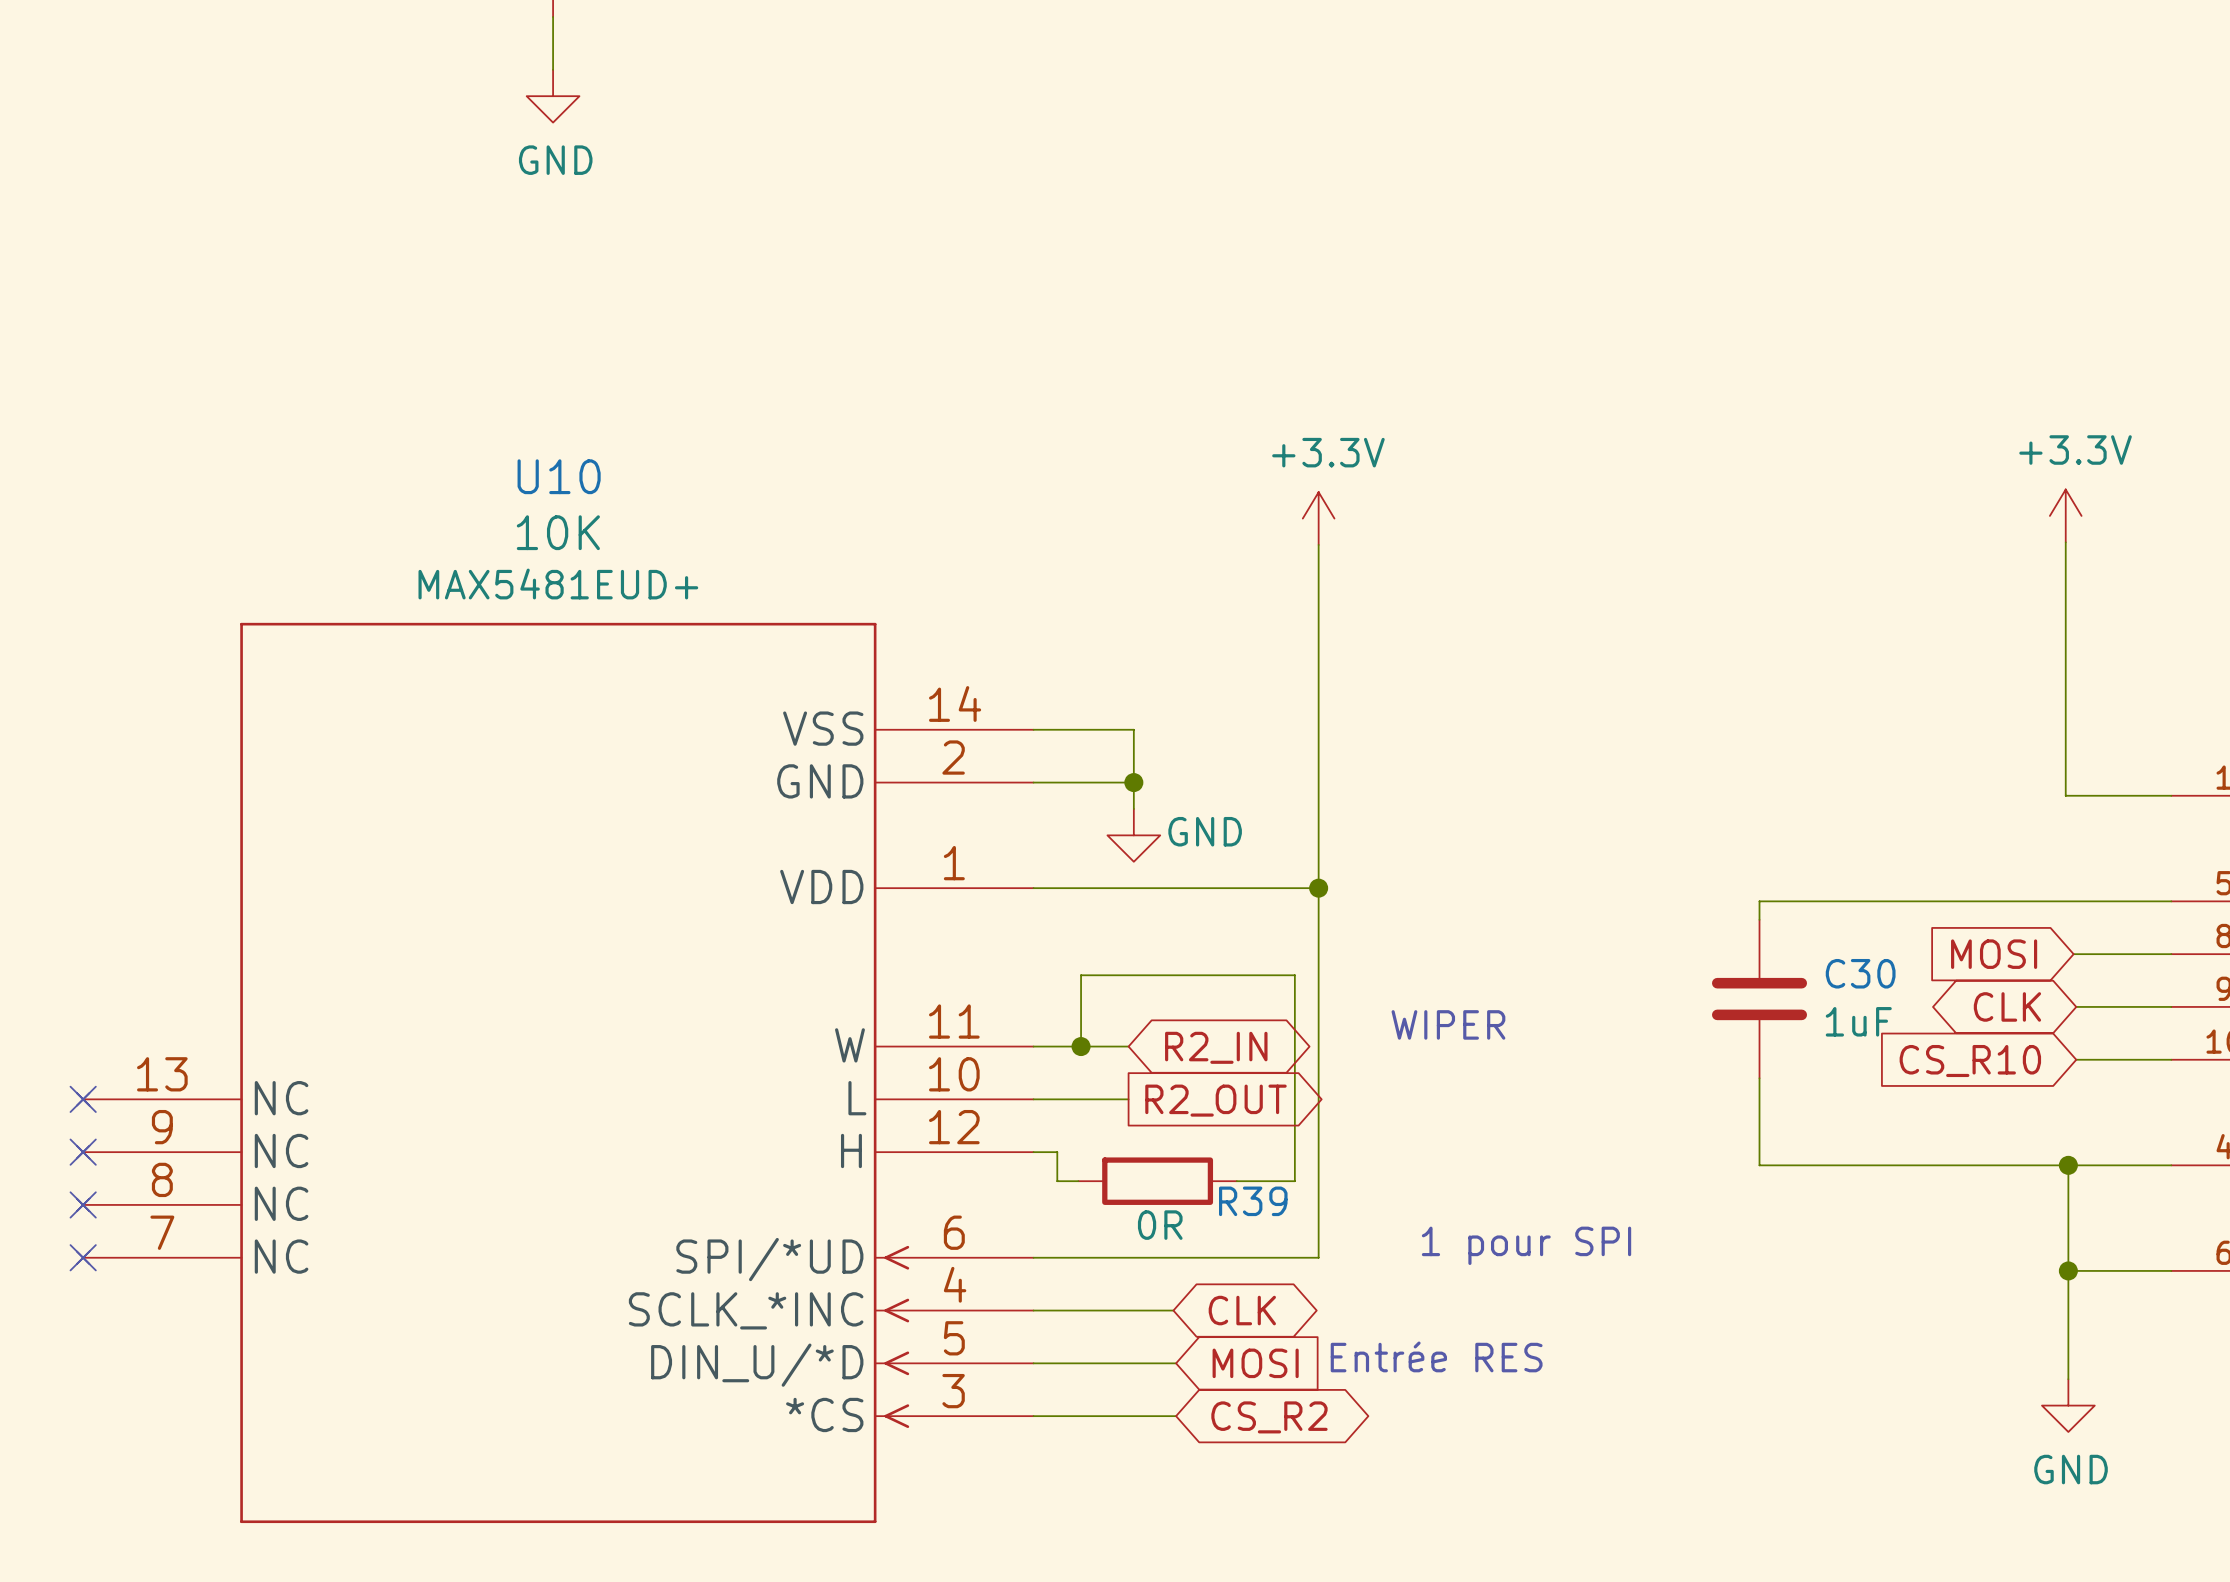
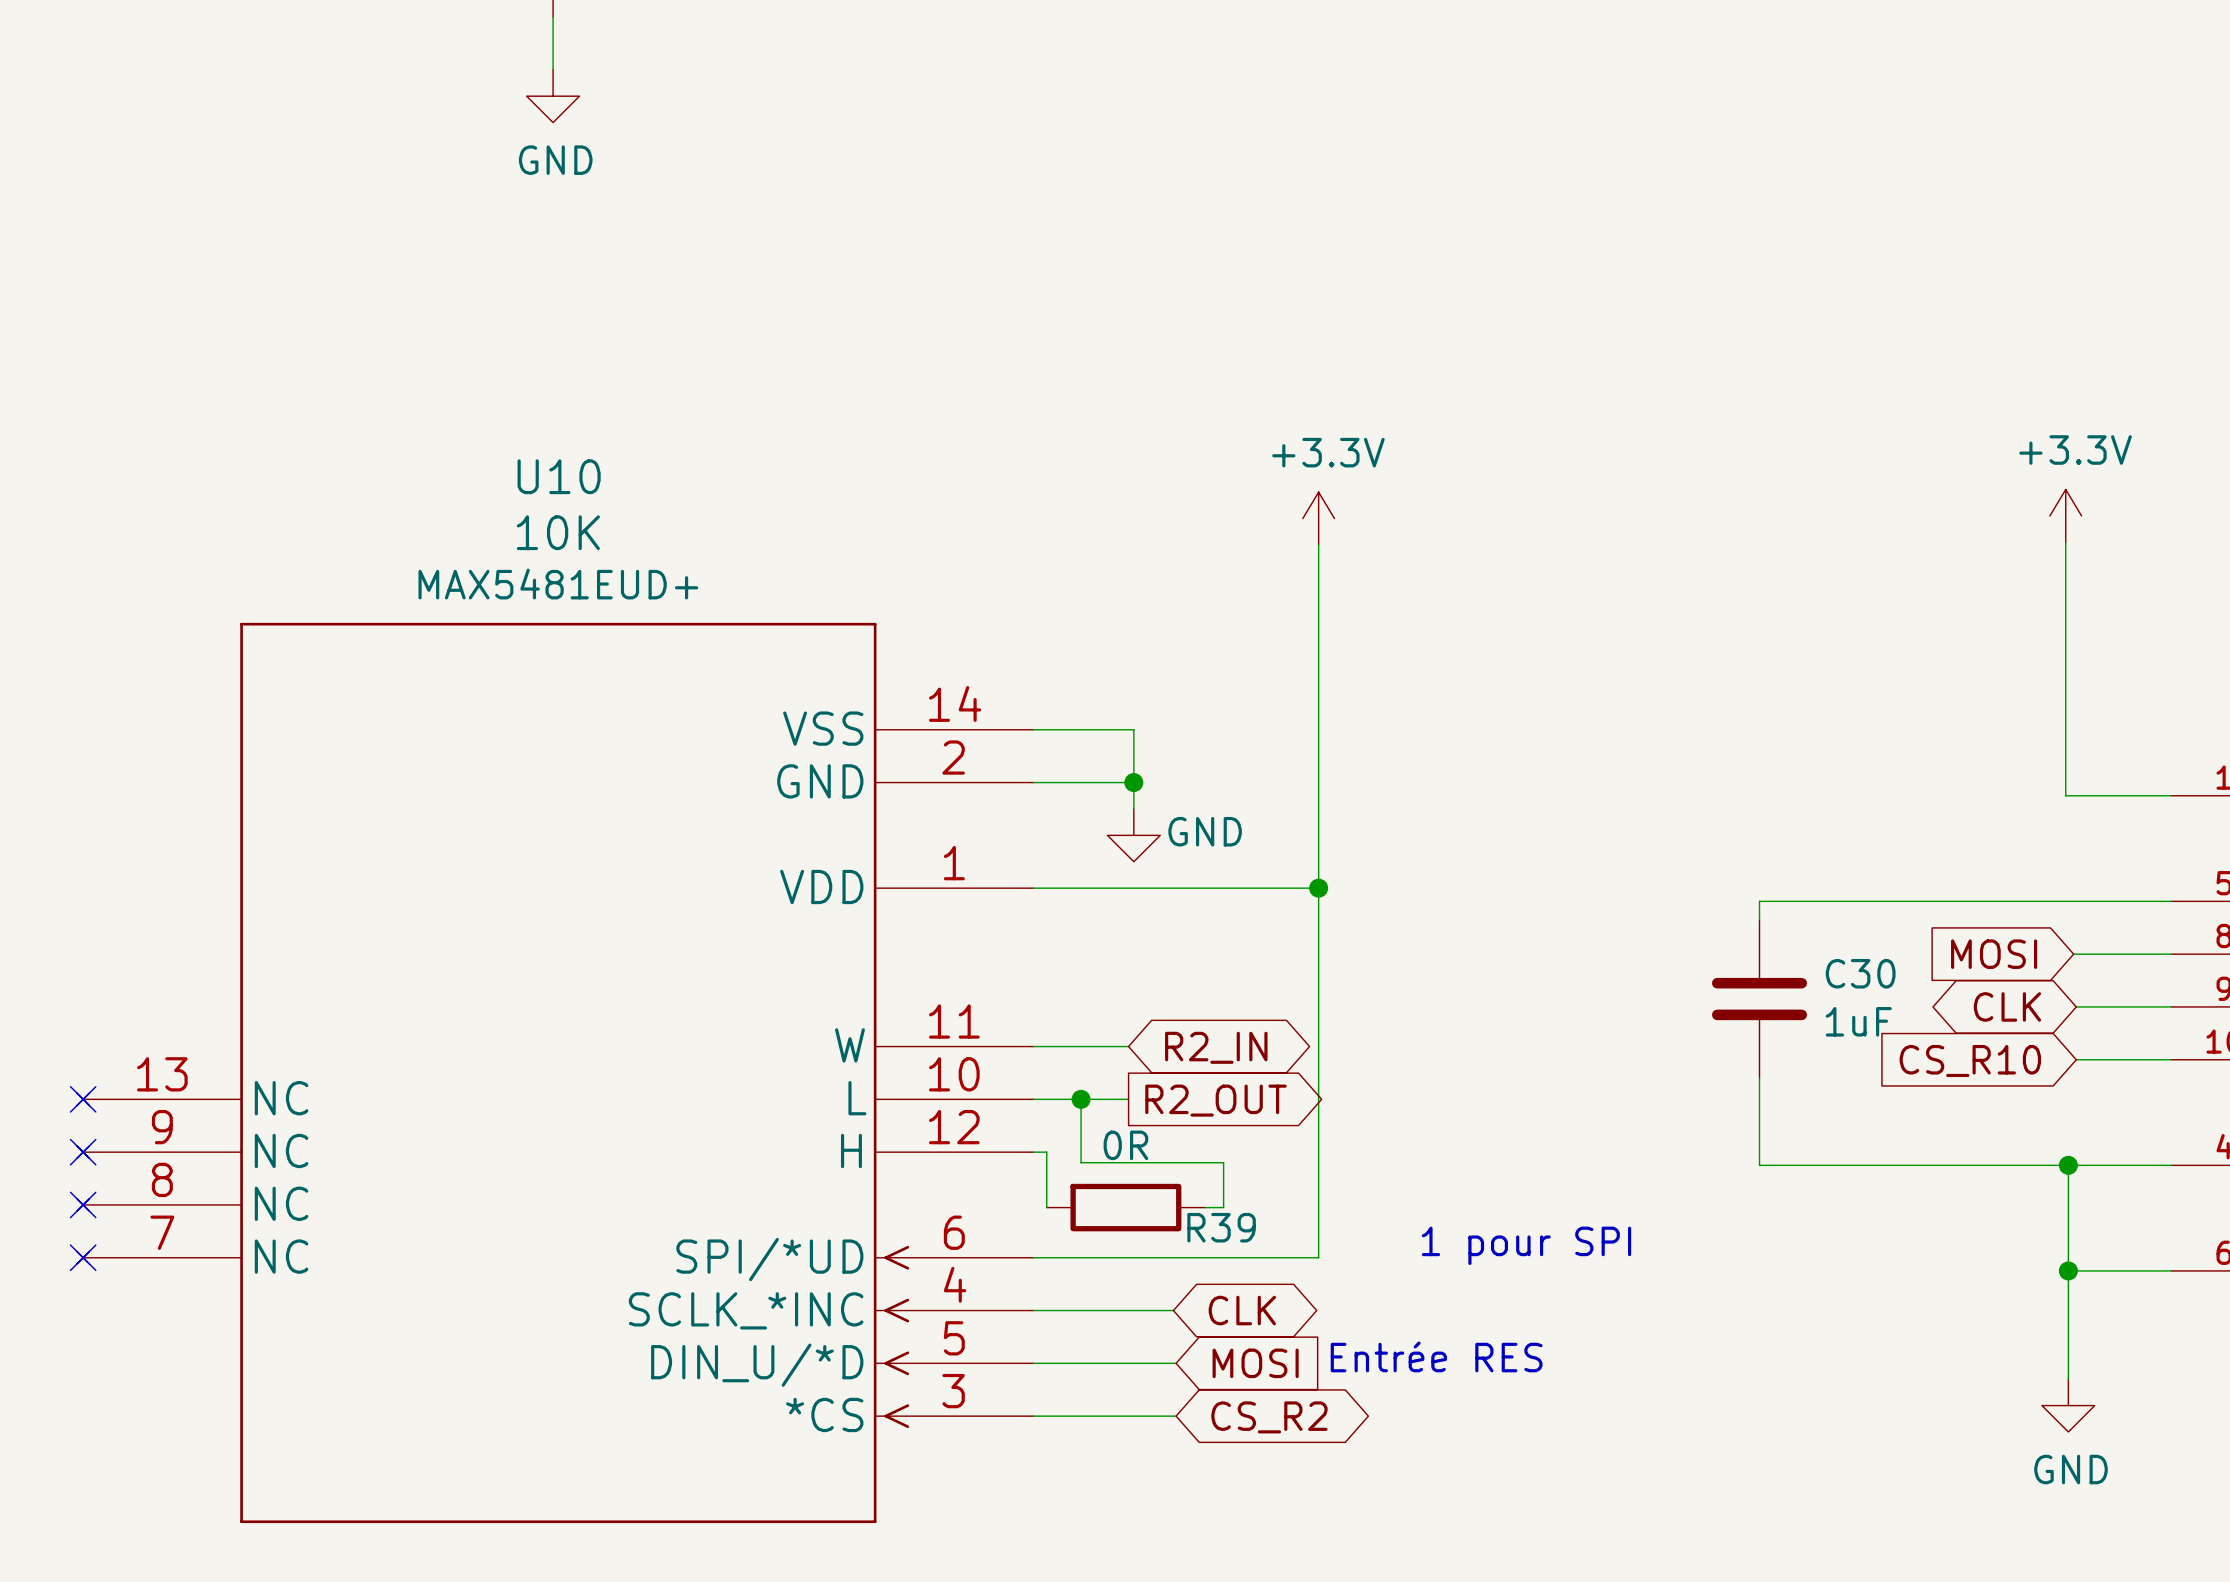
text: WIPER (1448, 1024) -> none
wire: (1081, 1046) (1081, 975) (1294, 975) (1294, 1181) (1236, 1181) -> none
junction position: (1081, 1046) -> (1081, 1099)
wire: none -> (1081, 1099) (1081, 1162) (1223, 1162) (1223, 1207) (1205, 1207)
wire: (1046, 1152) (1057, 1152) (1057, 1181) (1078, 1181) -> (1046, 1152) (1046, 1207)
R39 position: (1157, 1181) -> (1125, 1207)
R39 value position: 0R (1160, 1225) -> 0R (1125, 1145)

